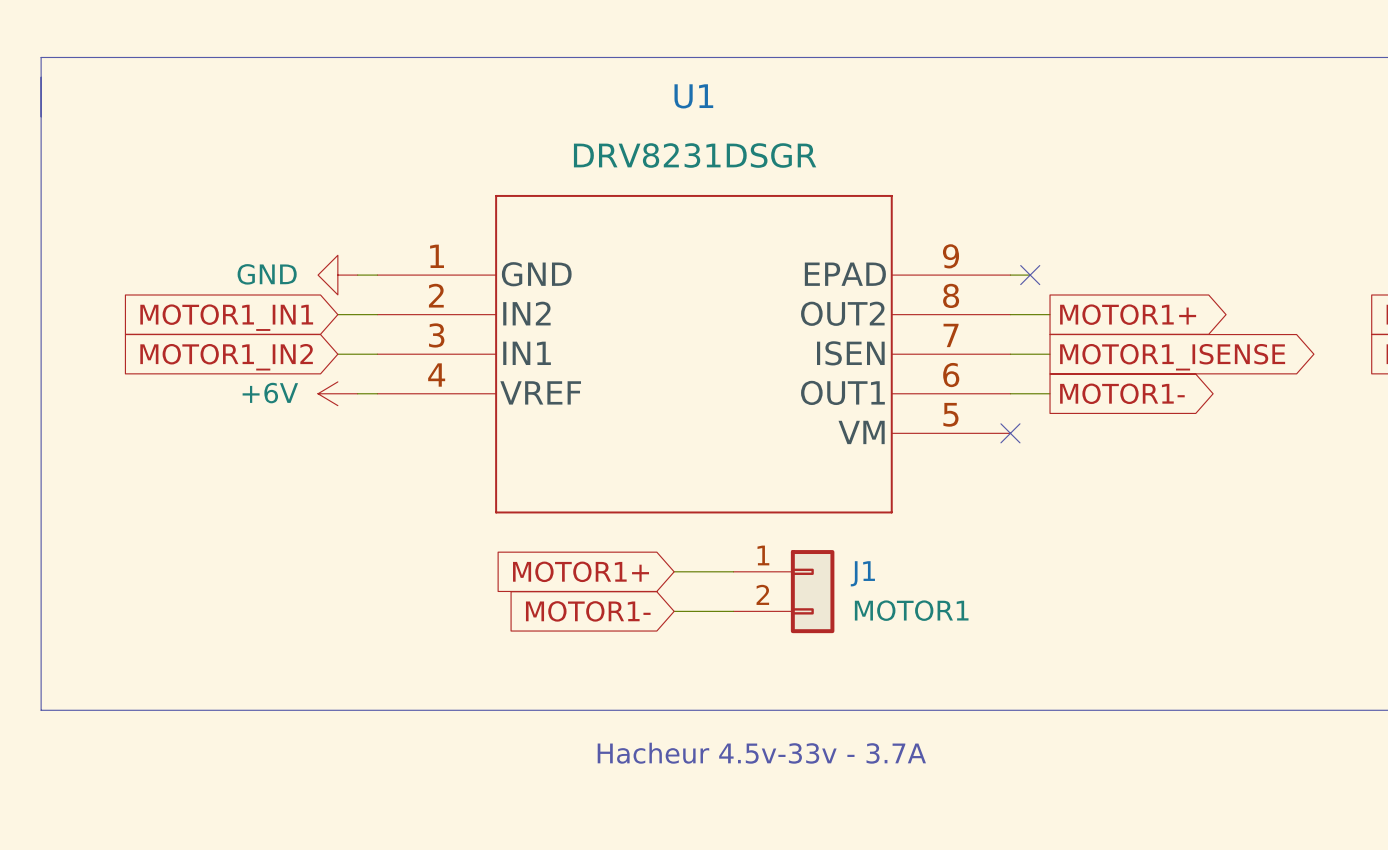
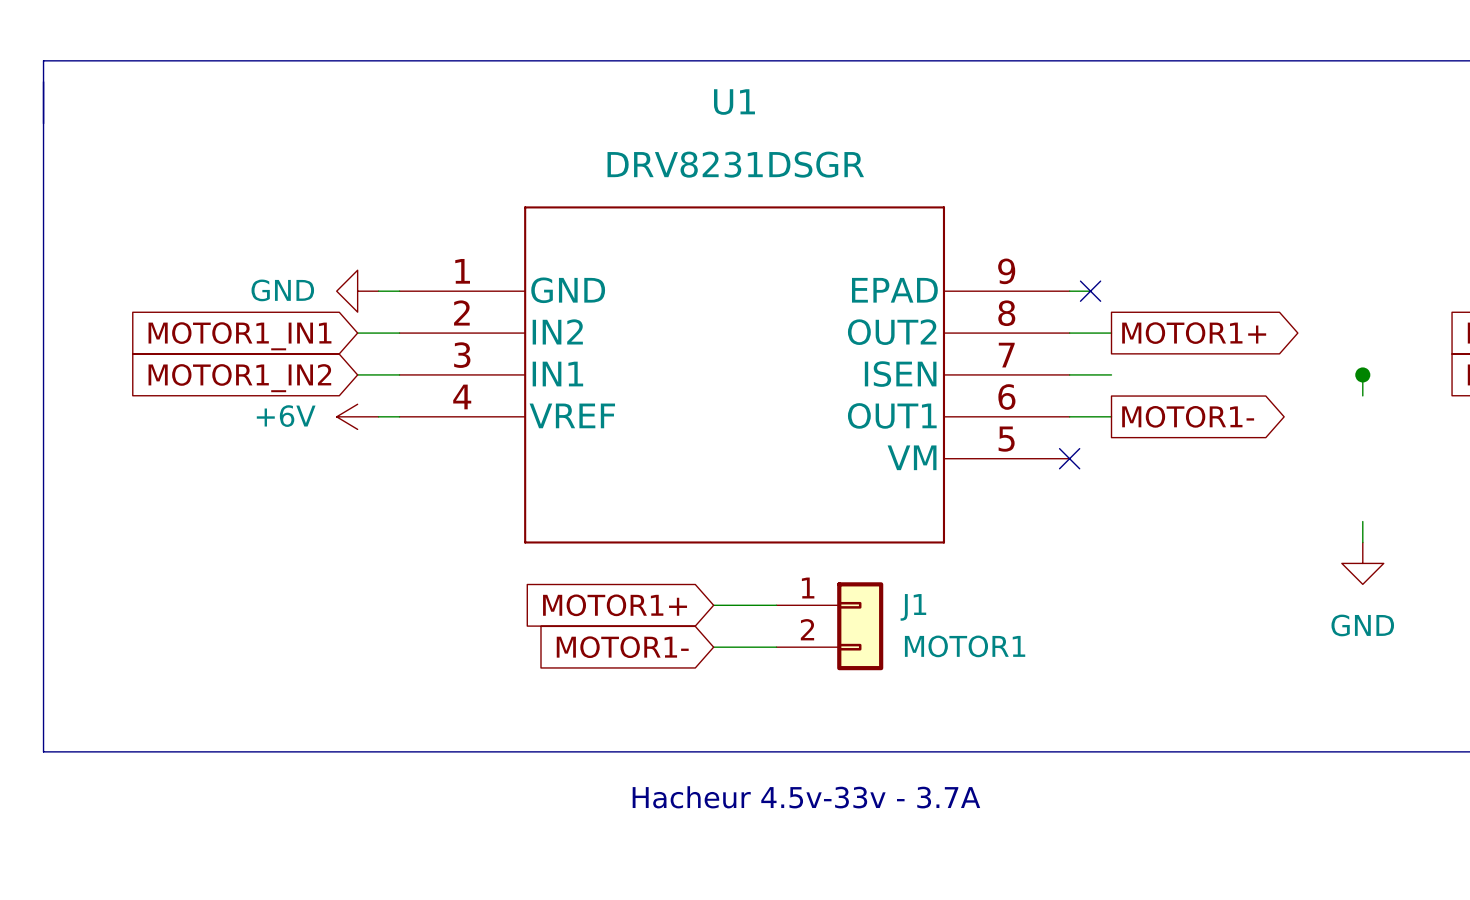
wire: none -> (1362, 374) (1362, 395)
junction: none -> (1362, 374)
global label: MOTOR1_ISENSE (1172, 357) -> none
wire: none -> (1362, 521) (1362, 542)
power symbol: none -> GND (1362, 563)

